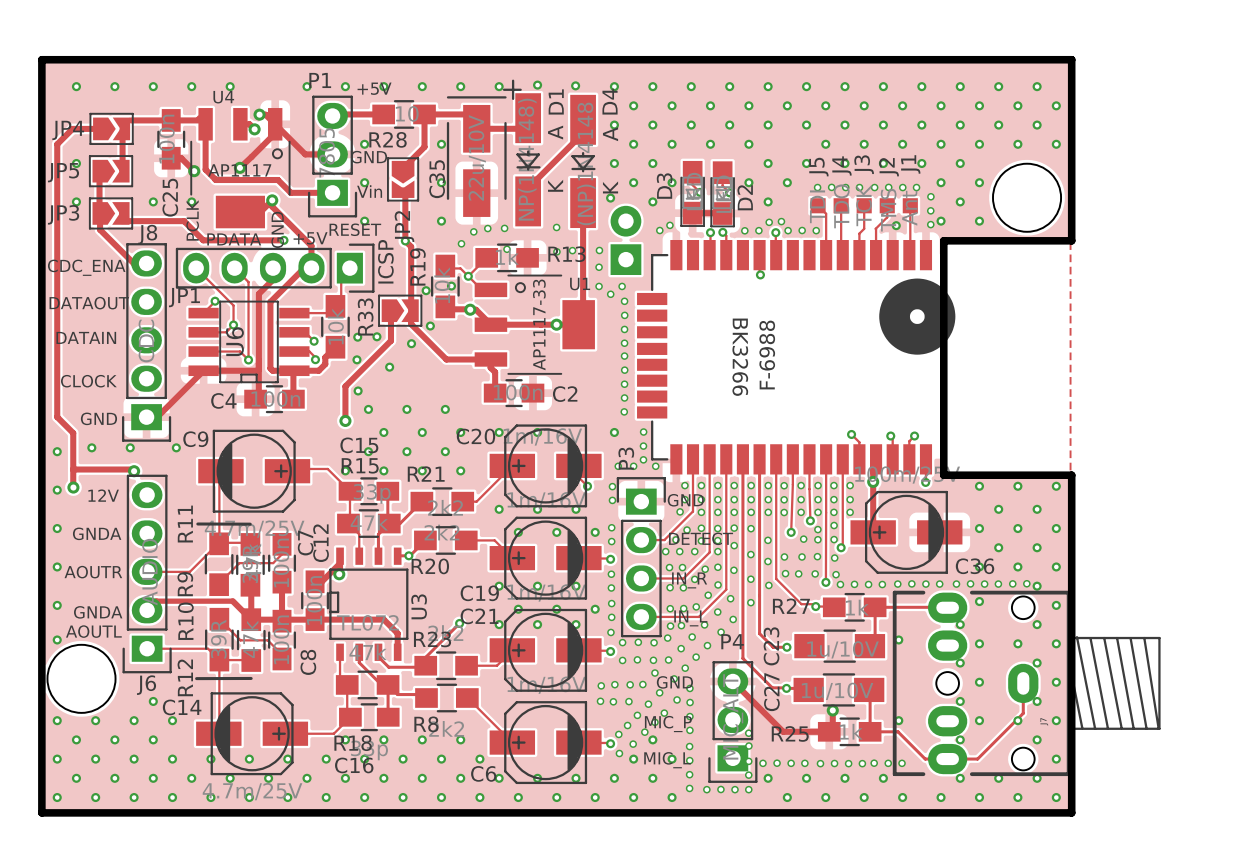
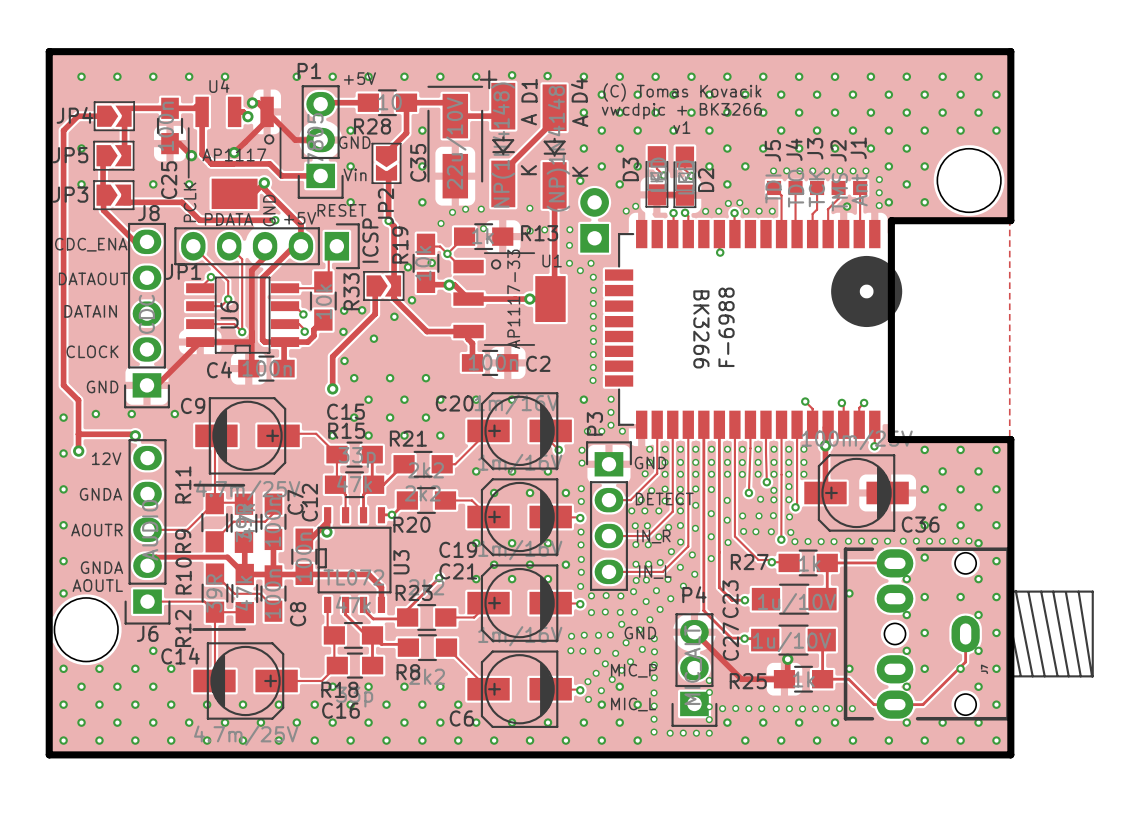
text: none -> (C) Tomas Kovacik (682, 92)
text: none -> vwcdpic + BK3266 (681, 111)
text: none -> v1 (681, 127)

